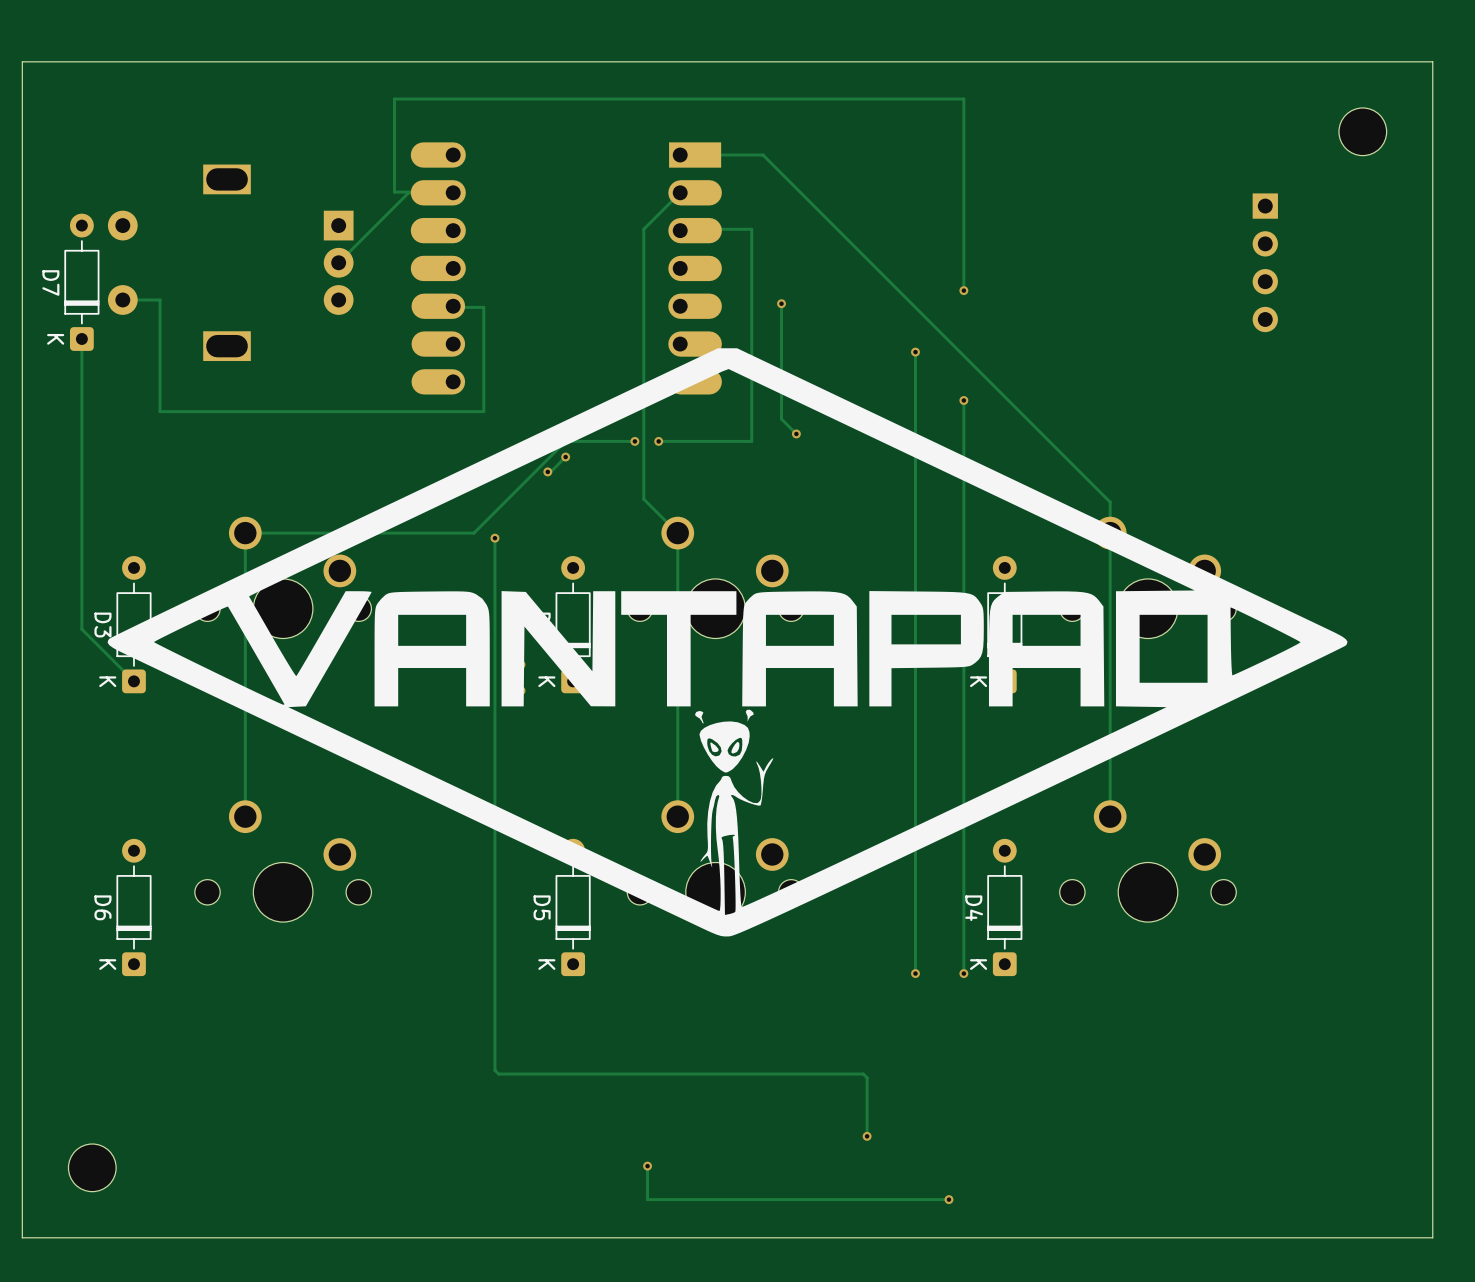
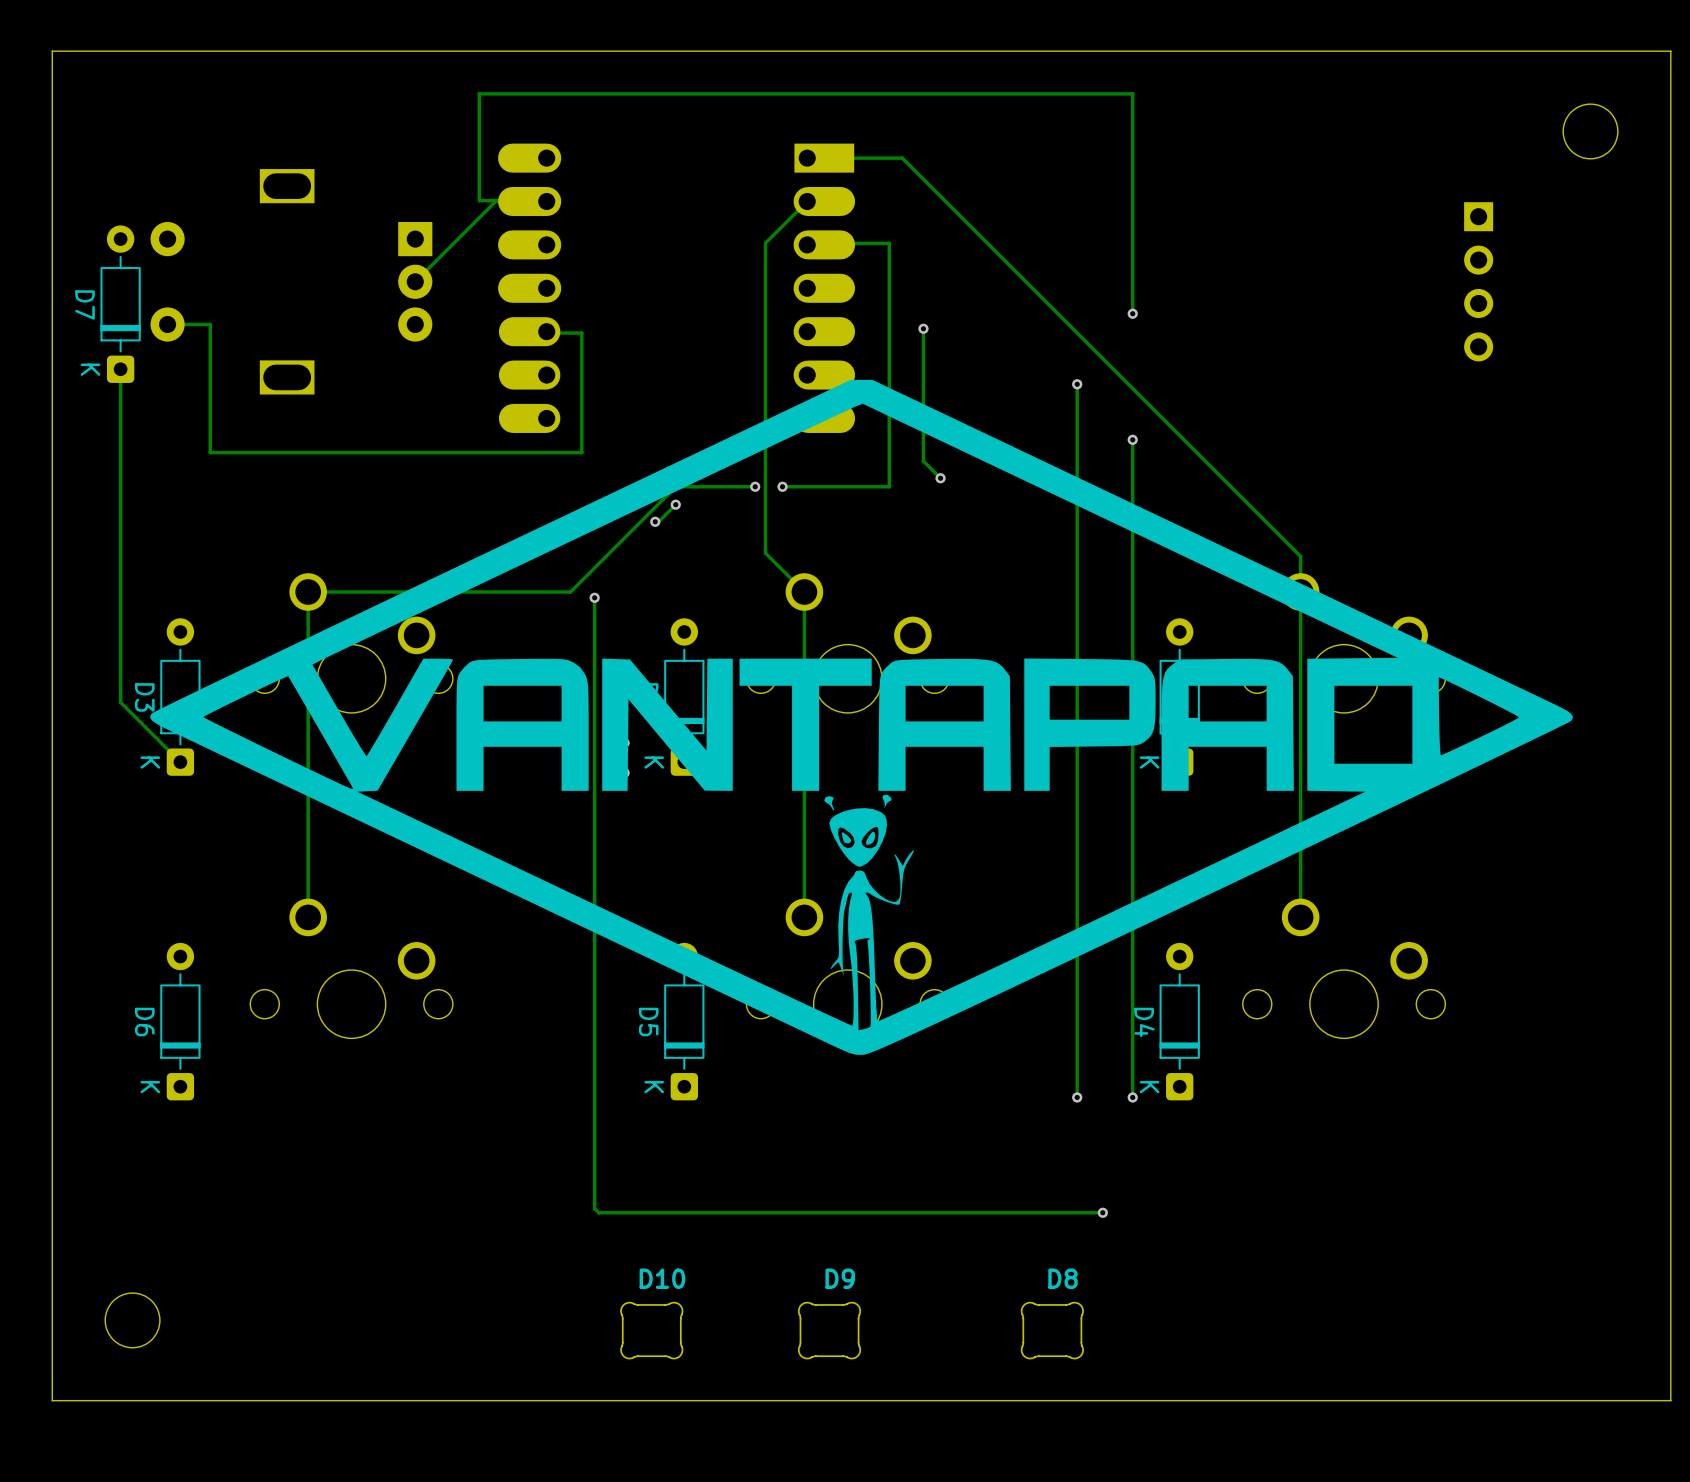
track: (863, 1074) (867, 1077) (867, 1136) -> (1017, 1212) (1102, 1212)
via: none -> (1102, 1212)
via: (867, 1136) -> none
track: (647, 1166) (647, 1199) (948, 1199) -> none
via: (647, 1166) -> none
D10: none -> (651, 1330)
D9: none -> (829, 1330)
D8: none -> (1052, 1330)
via: (948, 1199) -> none

